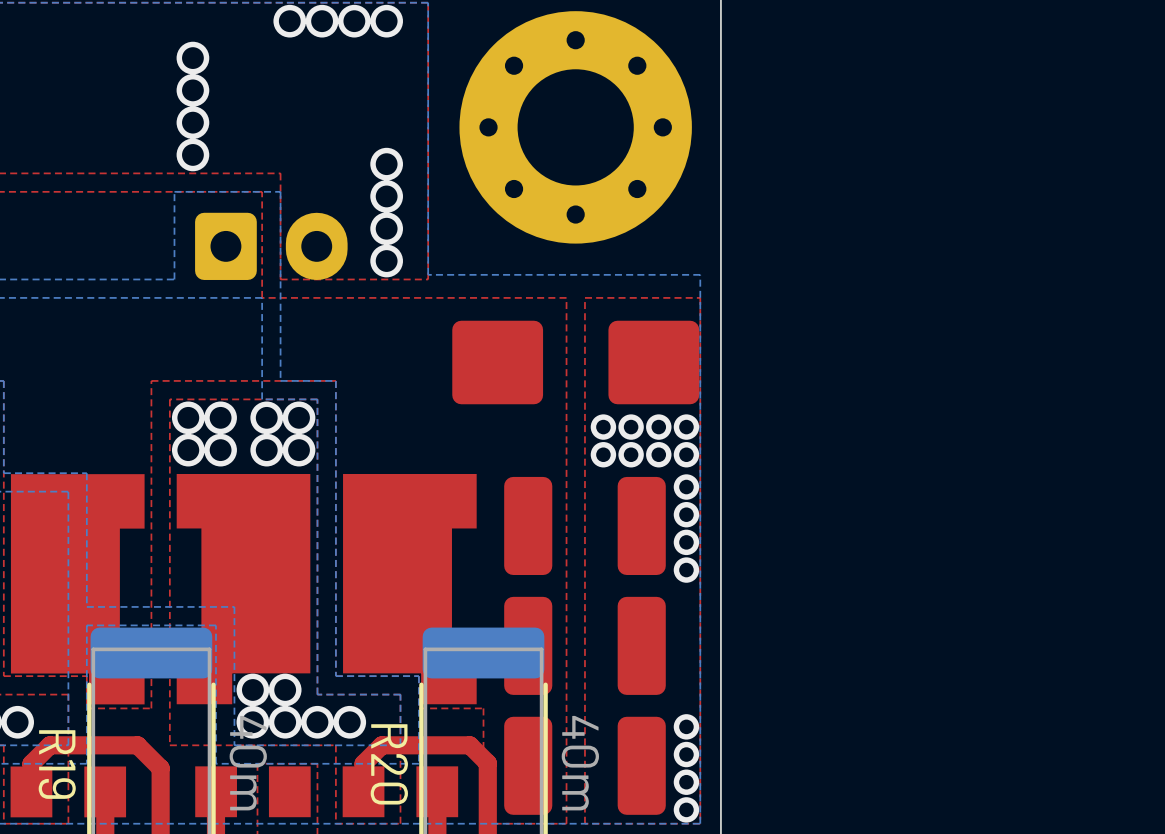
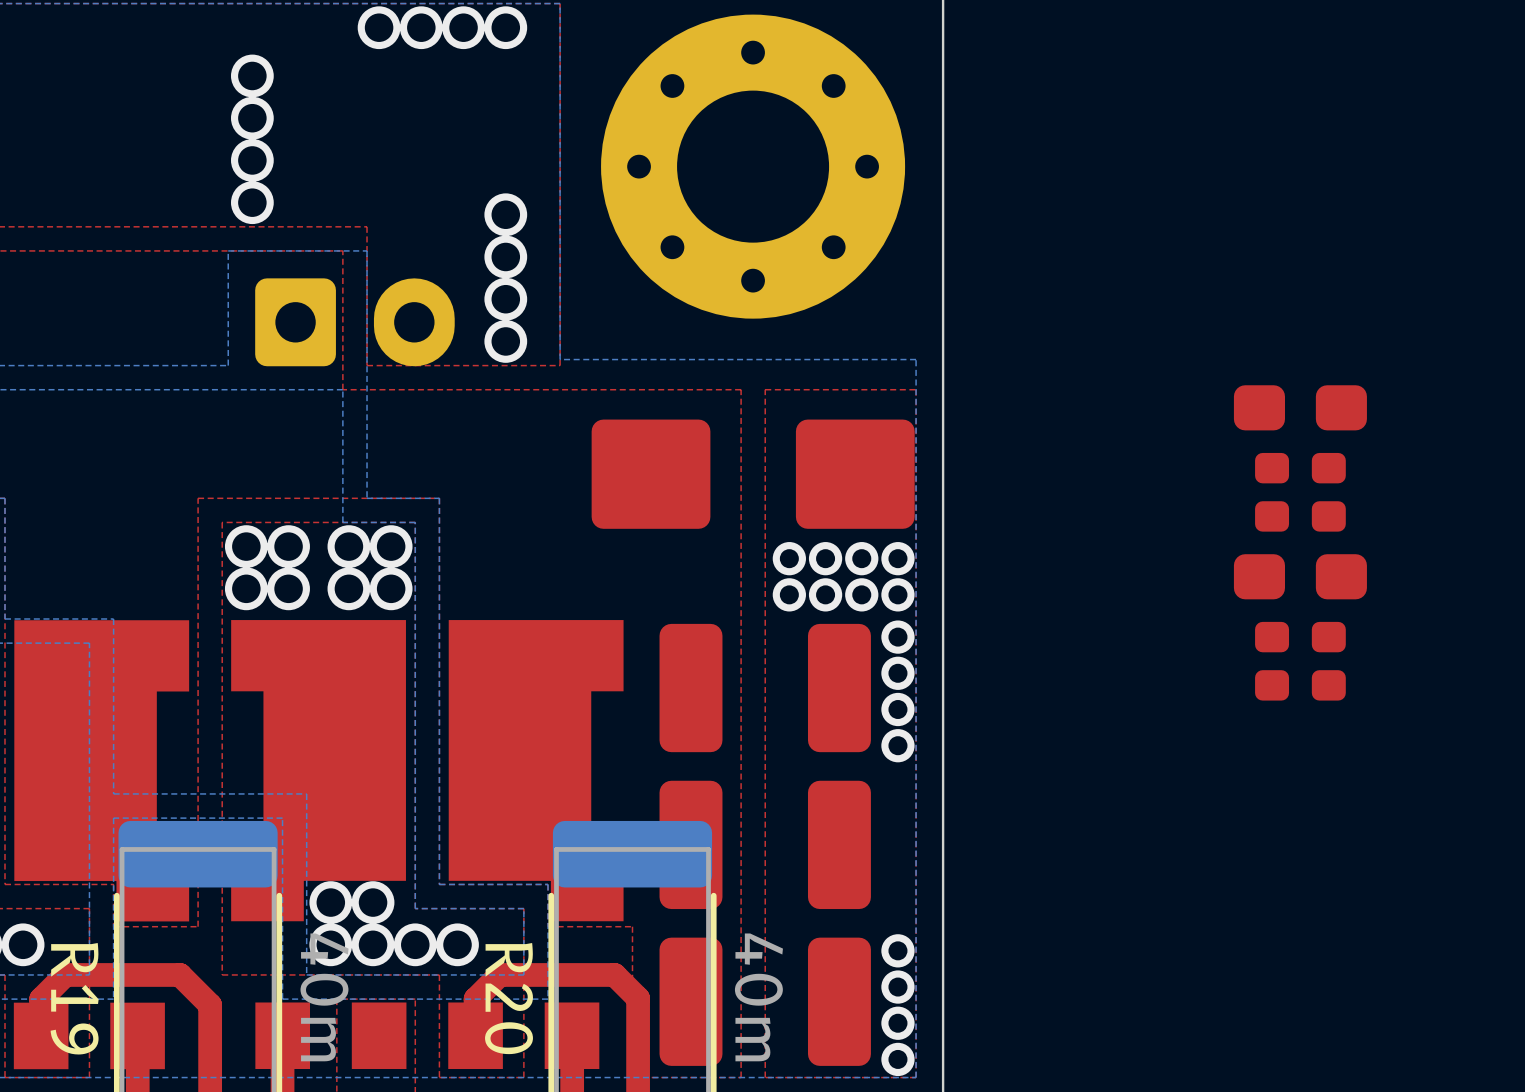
part: none -> (1300, 407)
part: none -> (1300, 468)
part: none -> (1300, 516)
part: none -> (1300, 576)
part: none -> (1300, 637)
part: none -> (1300, 685)

